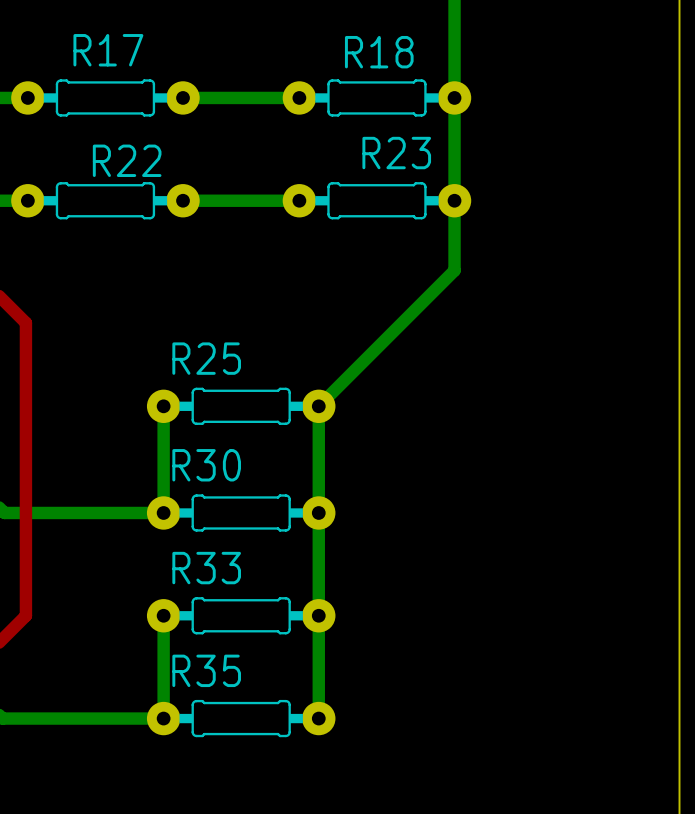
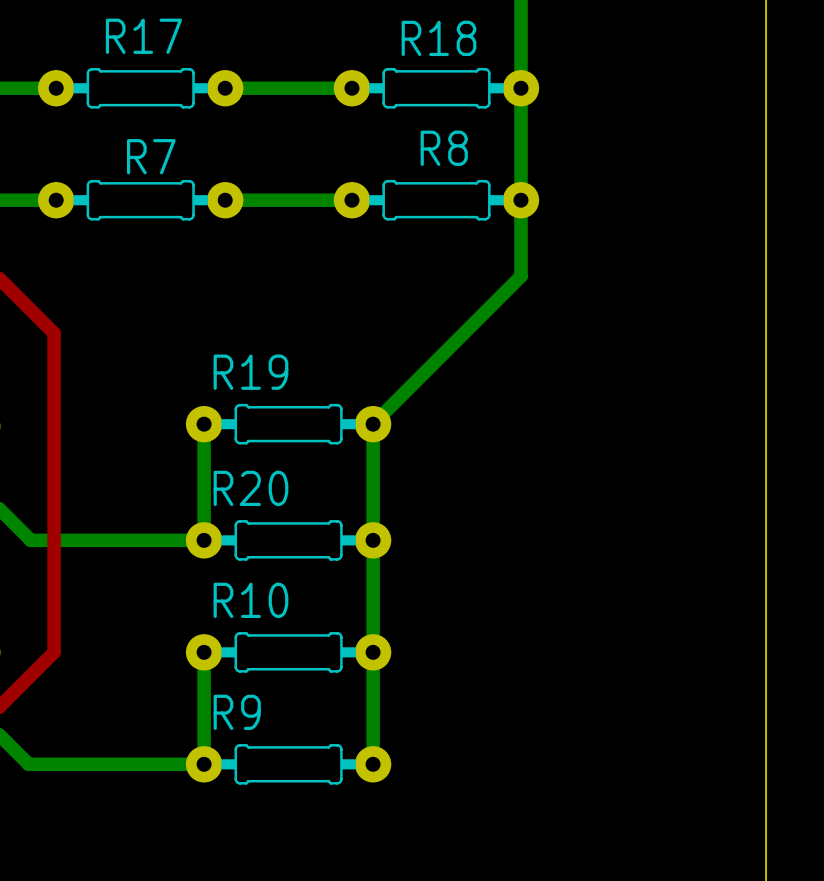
R23 name: R23 (396, 153) -> R8 (444, 148)
R22 name: R22 (127, 160) -> R7 (151, 156)
R25 name: R25 (206, 358) -> R19 (250, 372)
R30 name: R30 (206, 465) -> R20 (250, 488)
R33 name: R33 (206, 568) -> R10 (250, 600)
R35 name: R35 (206, 670) -> R9 (237, 712)

